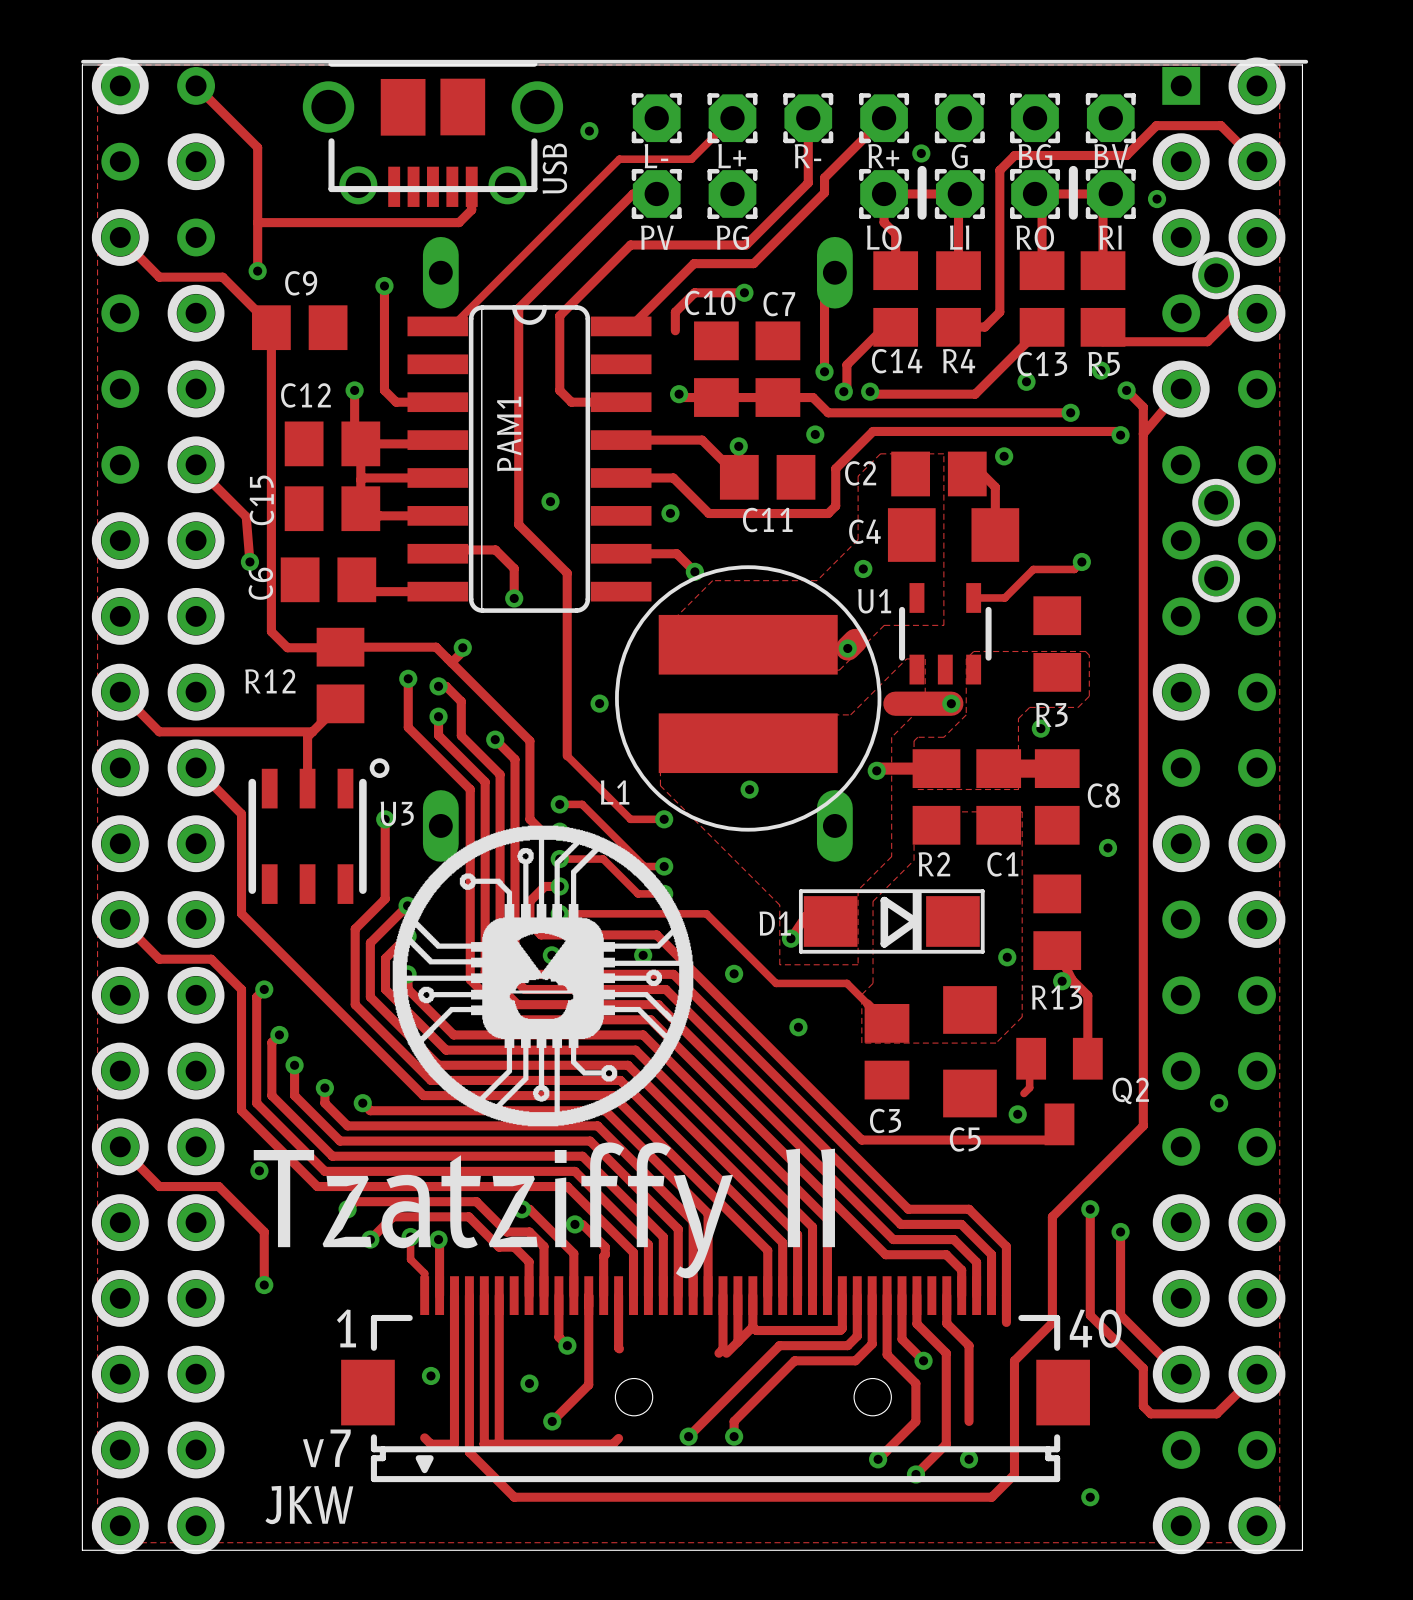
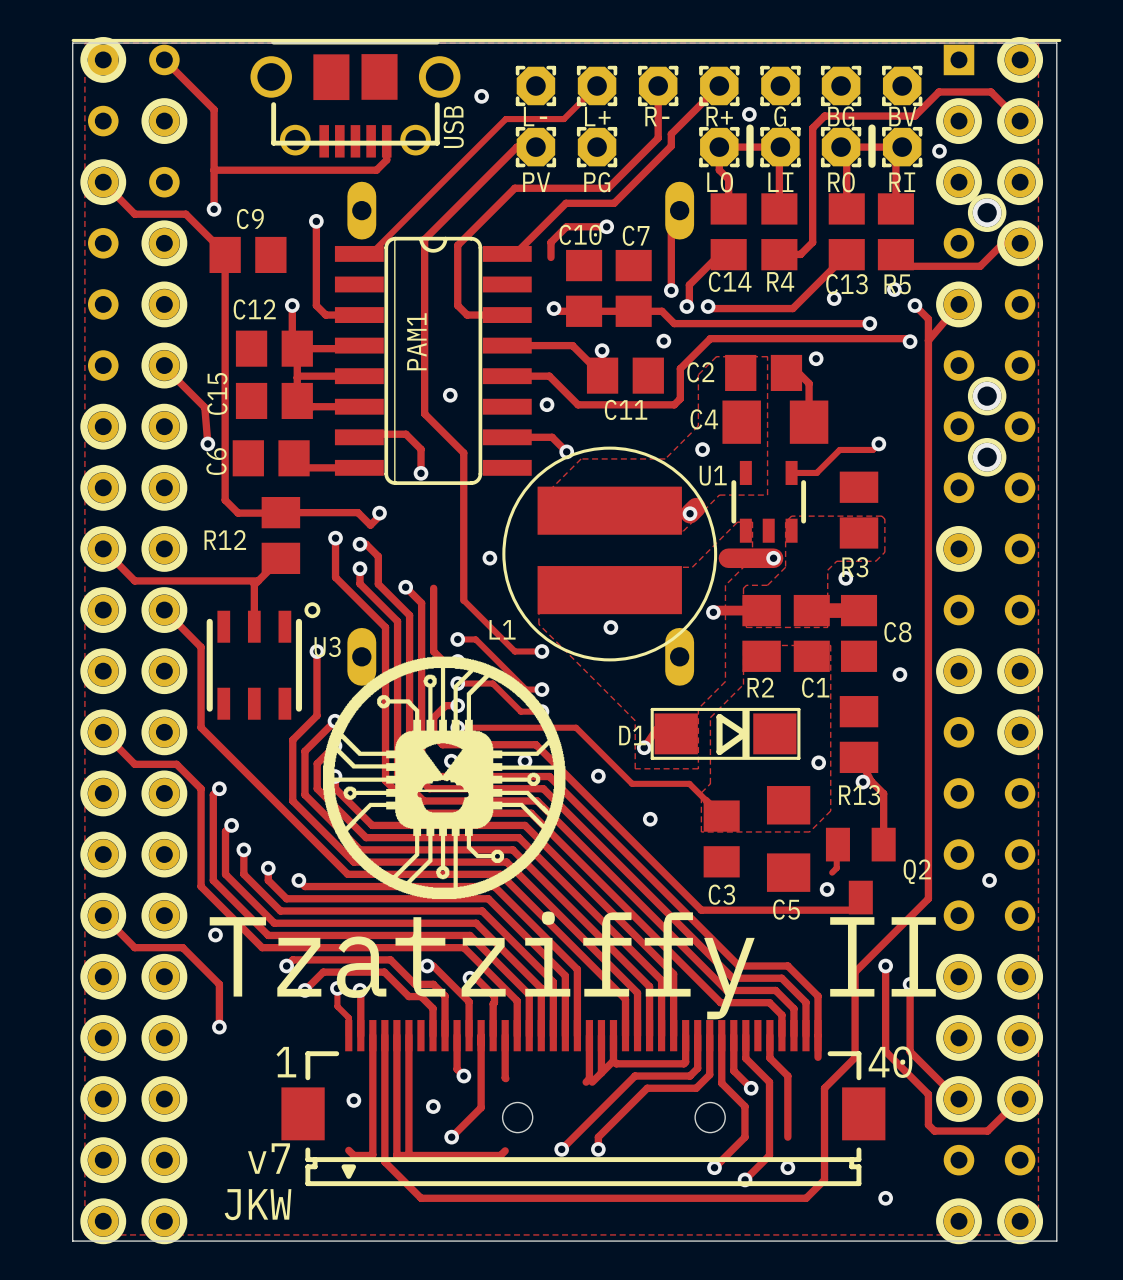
track: (451, 662) (529, 741) -> none

